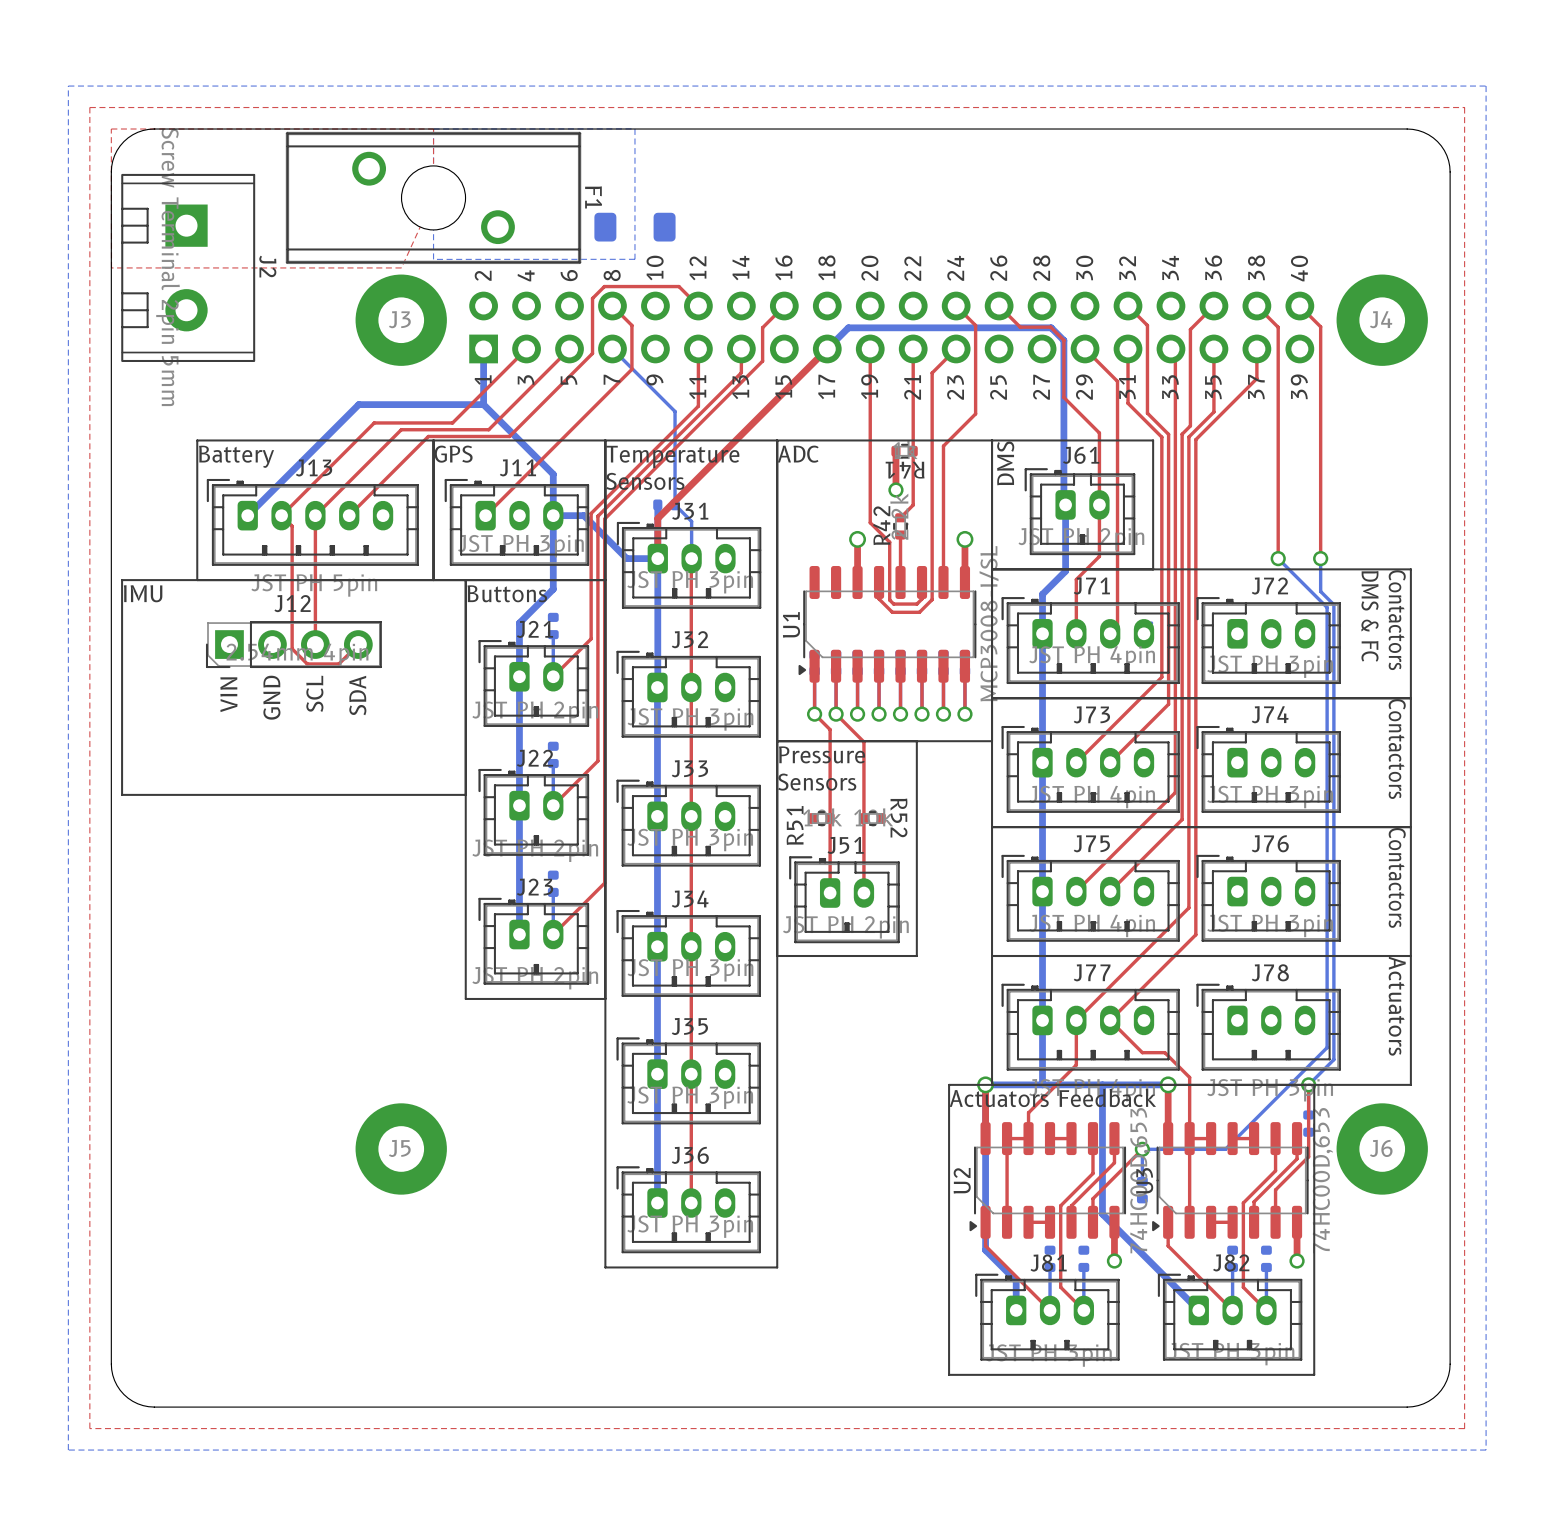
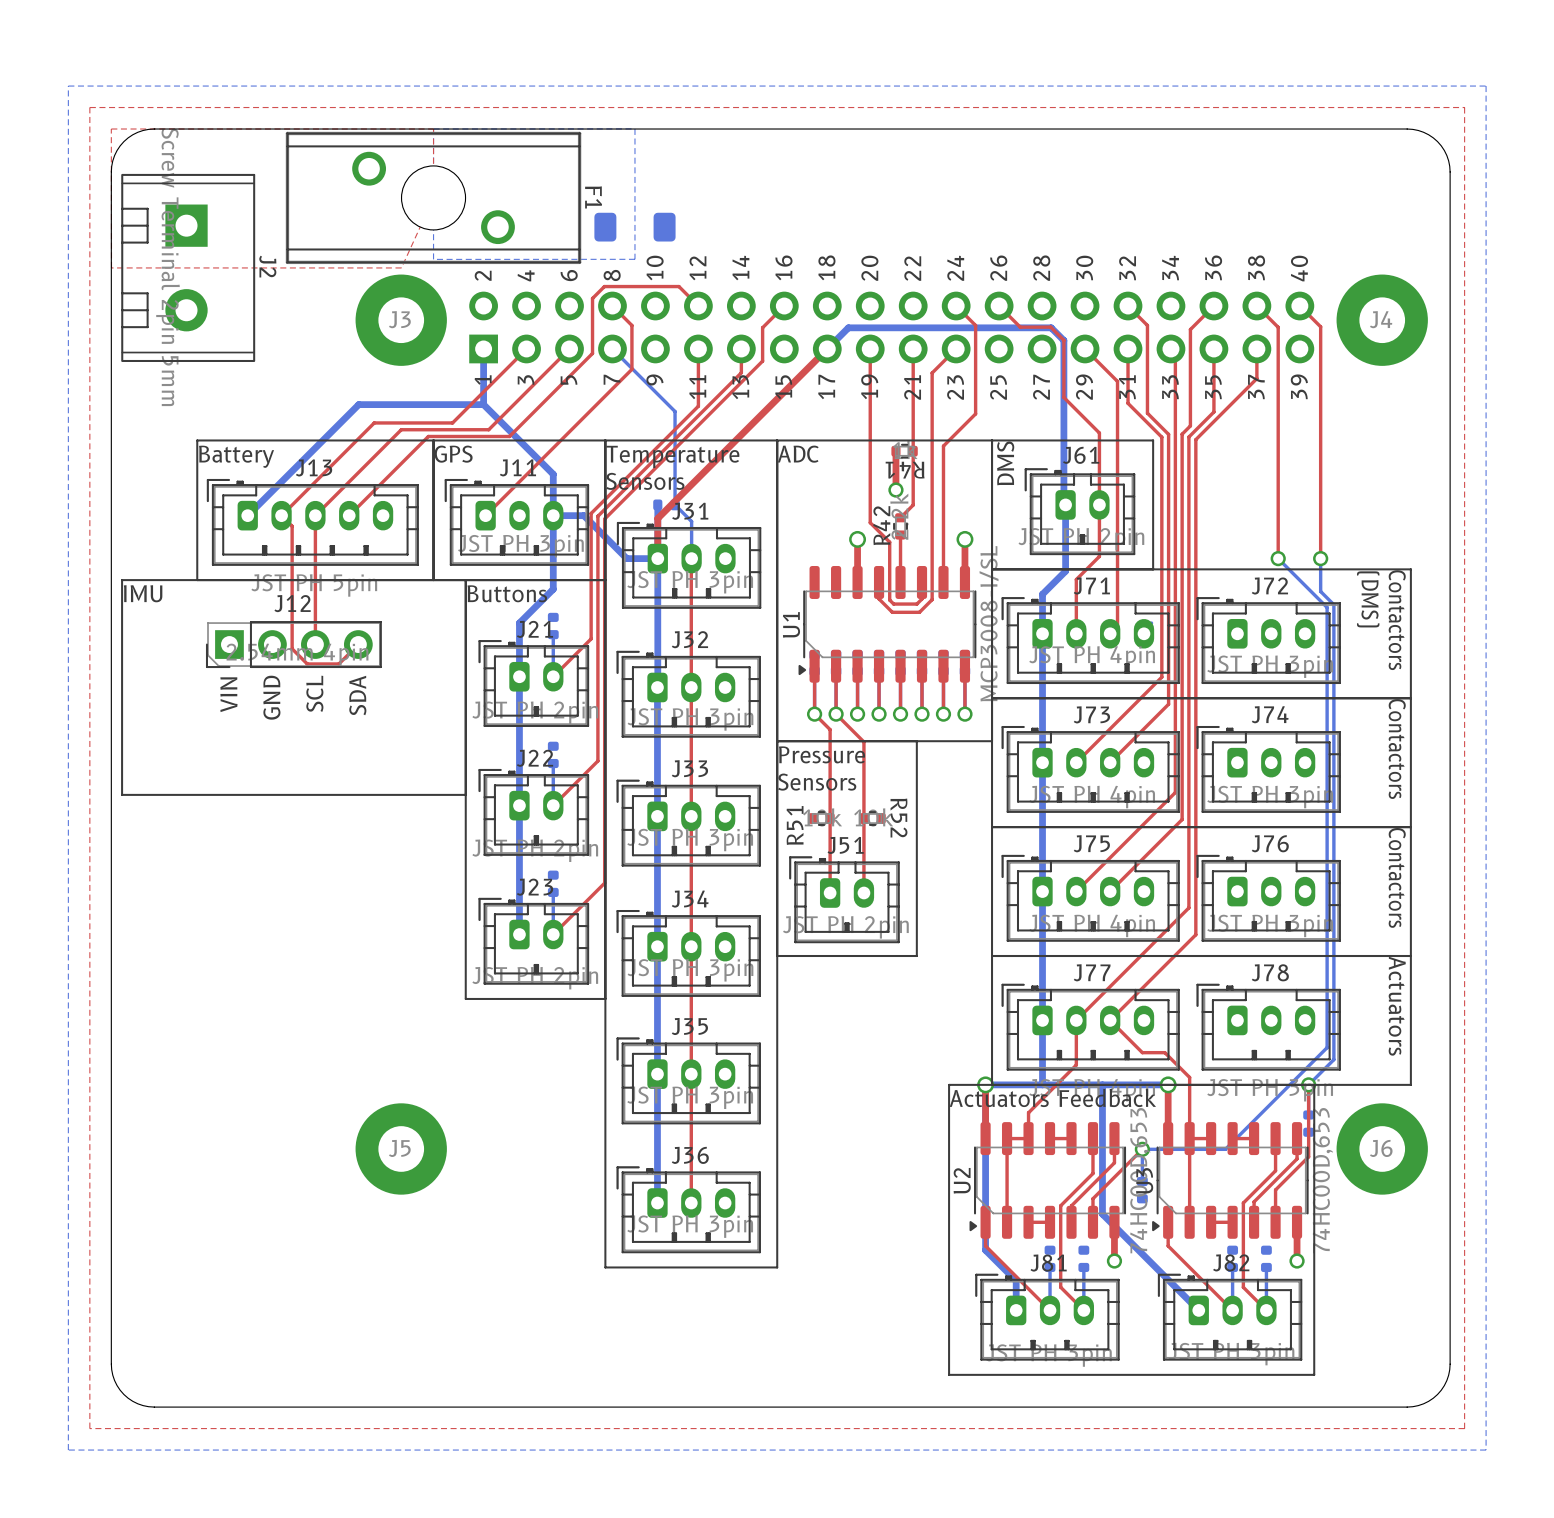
text: DMS & FC (1369, 616) -> (DMS) (1368, 599)

